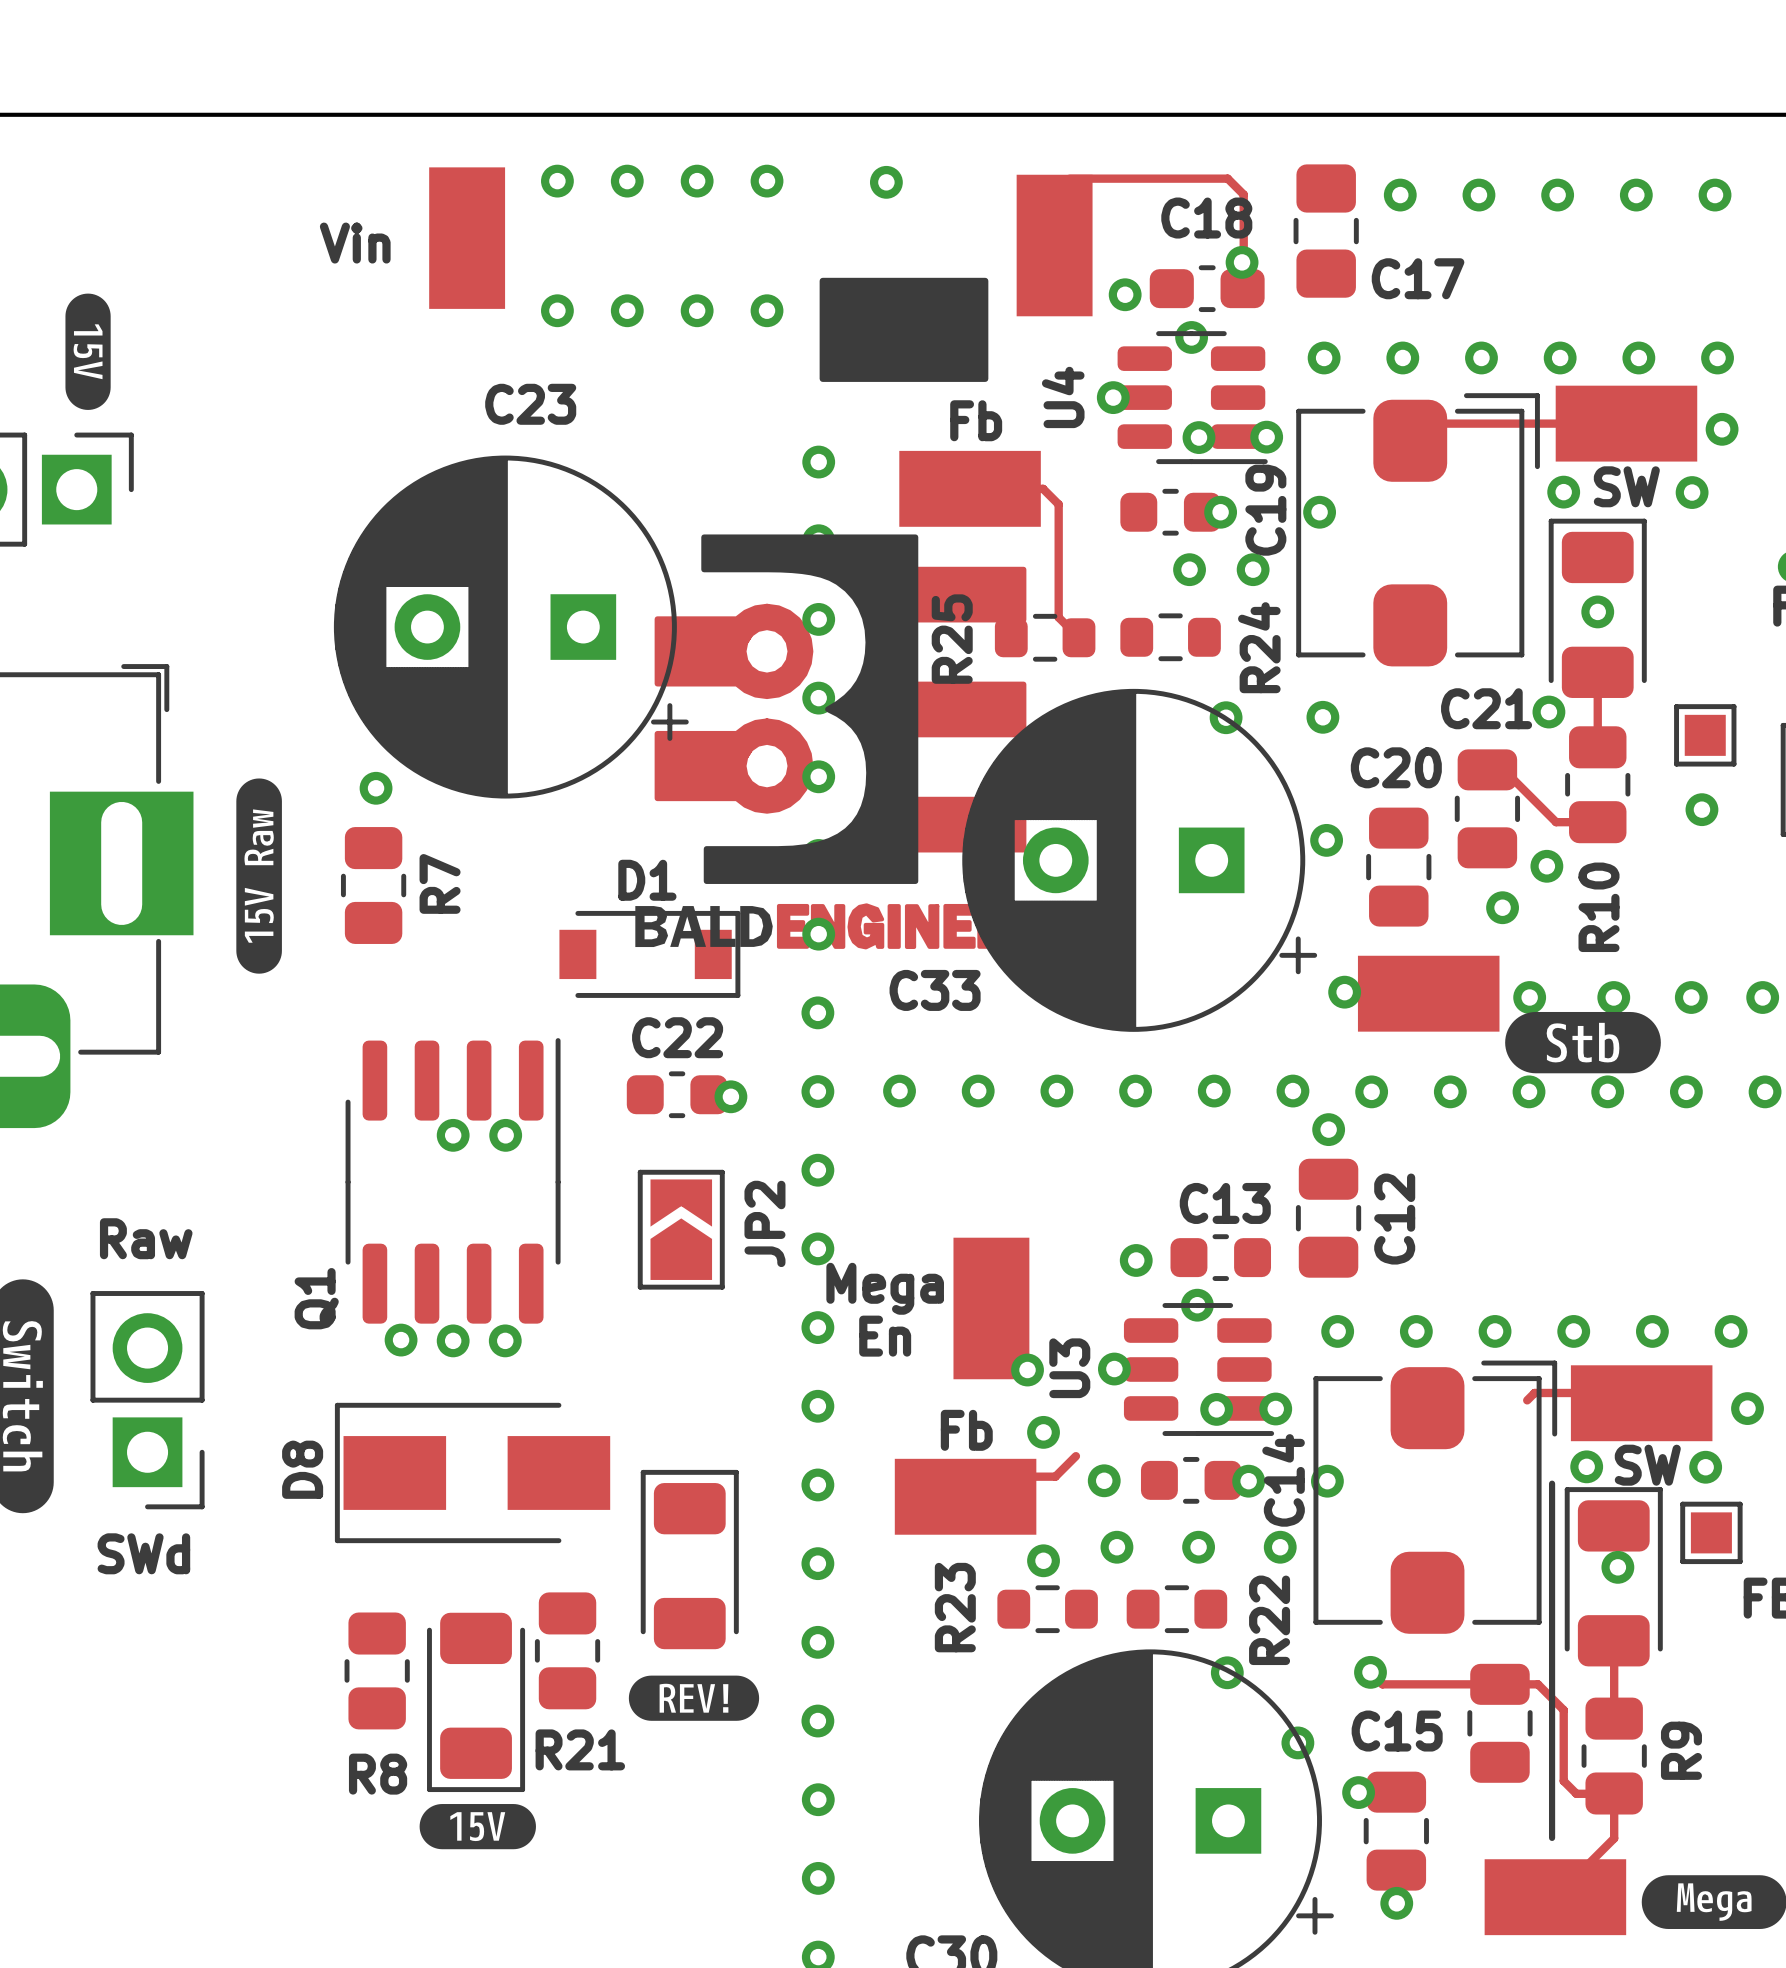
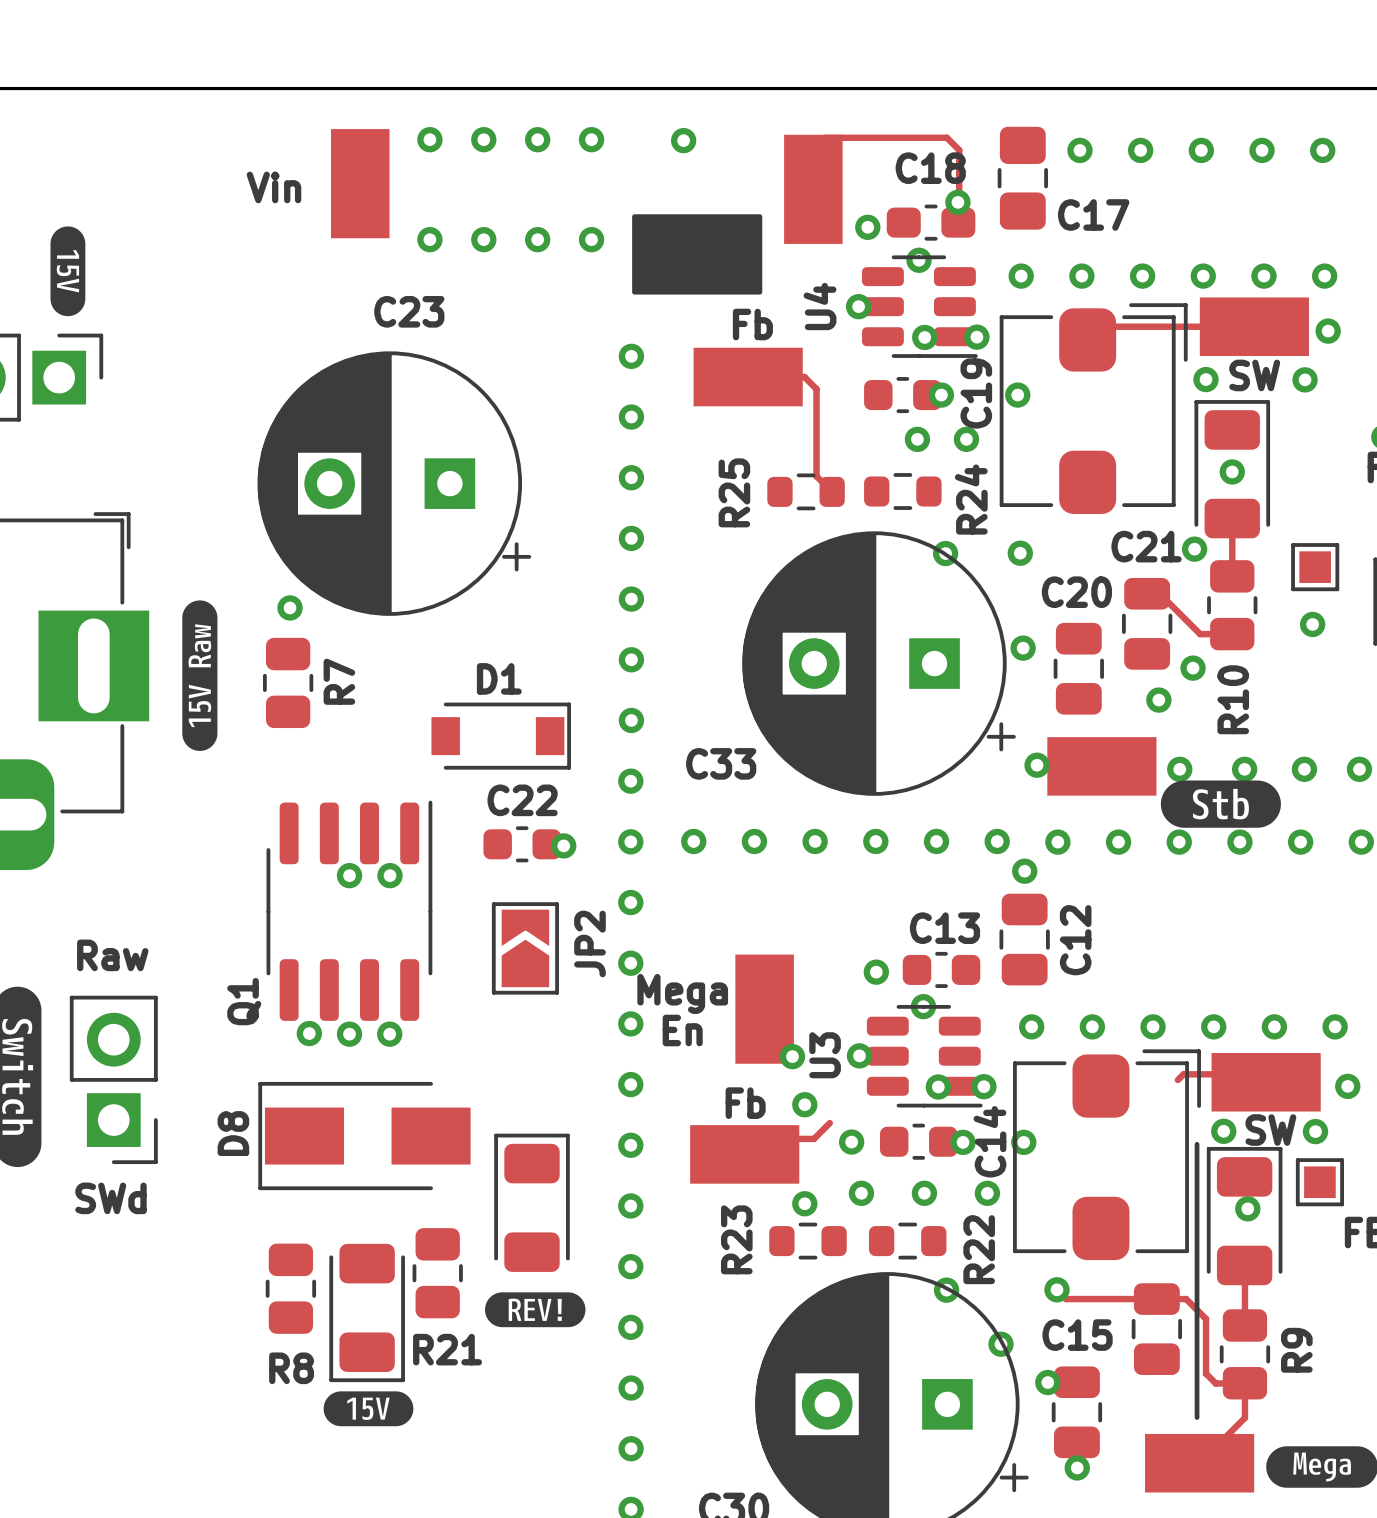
drawing: [635, 534, 1048, 950] -> none

